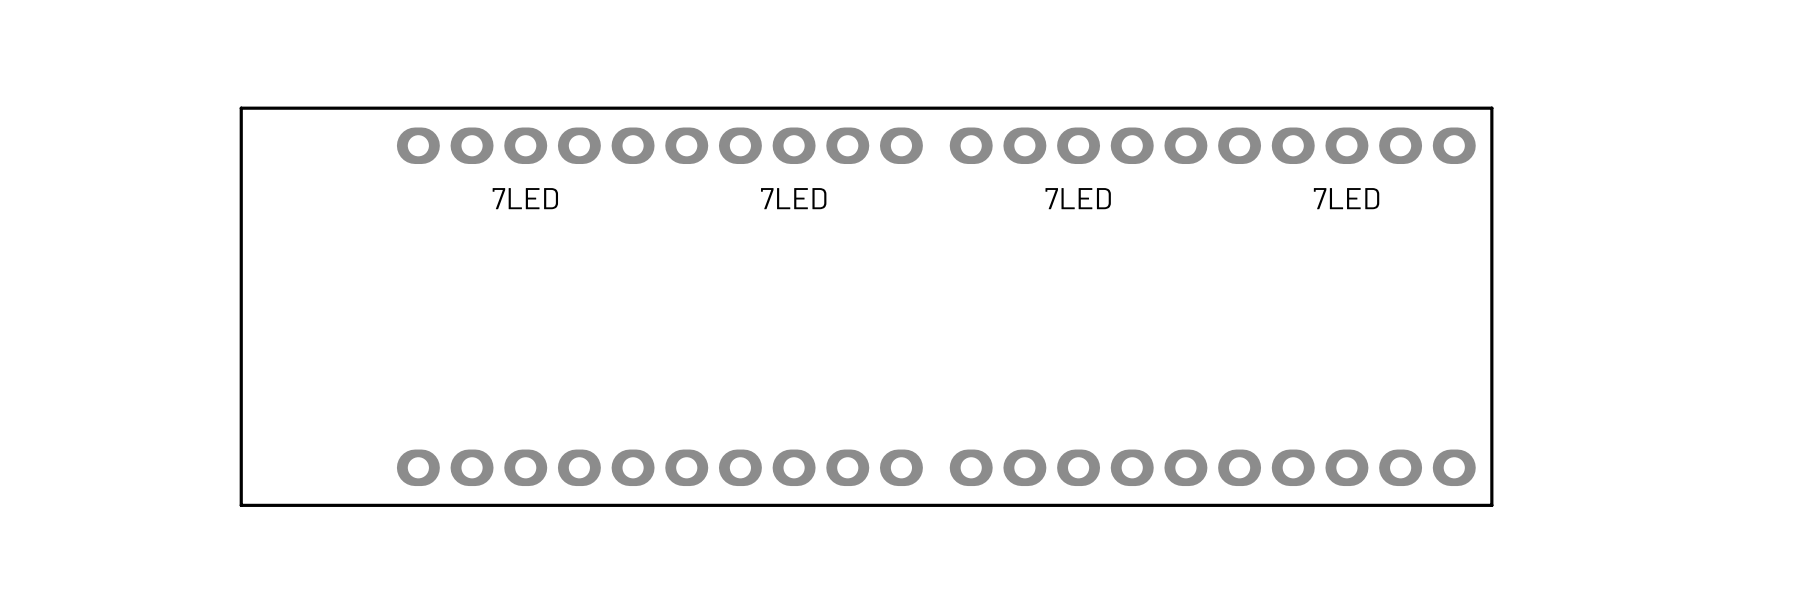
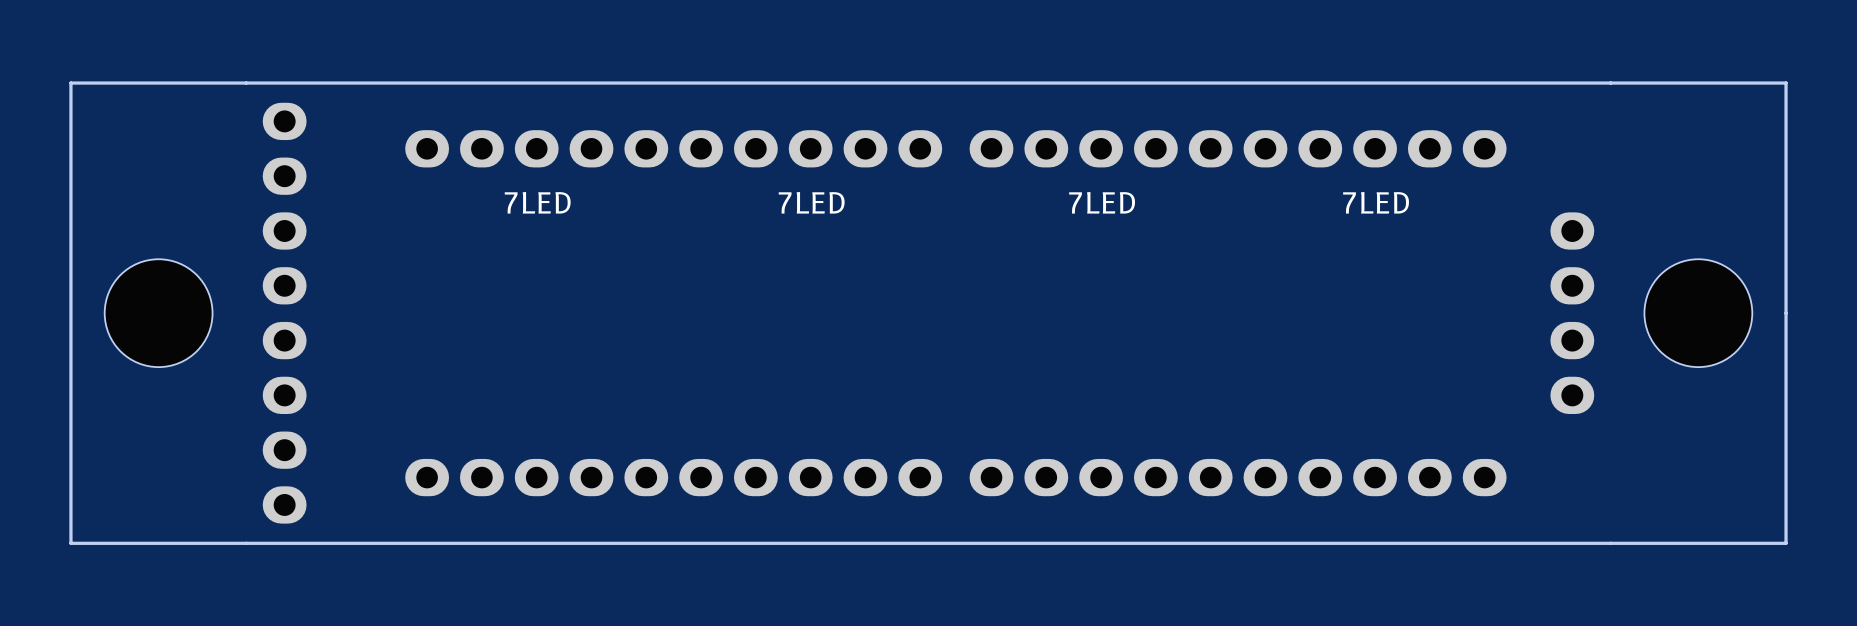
board edge: (241, 108) (1491, 108) (1491, 505) (241, 505) (241, 108) -> (70, 83) (70, 543) (1786, 543) (1786, 83) (70, 83)
part: none -> (158, 313)
part: none -> (284, 313)
part: none -> (1572, 313)
part: none -> (1698, 313)

